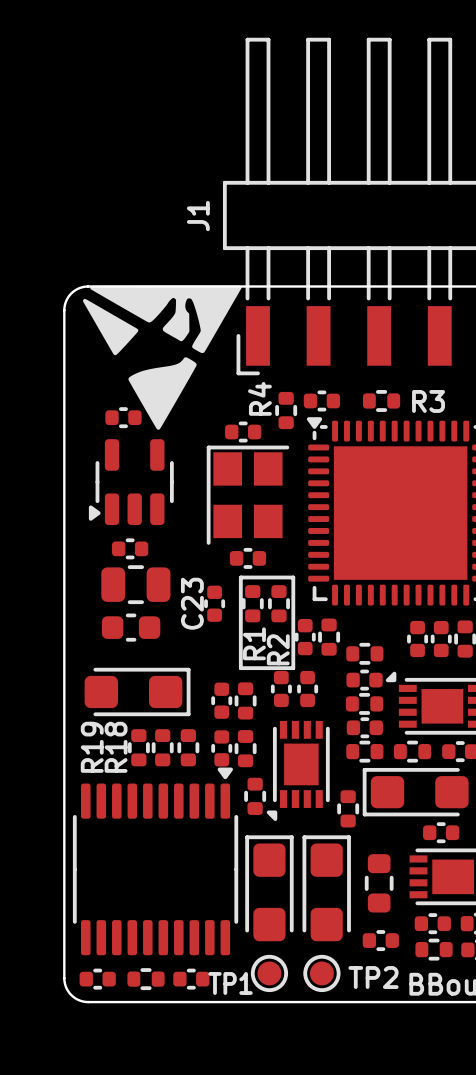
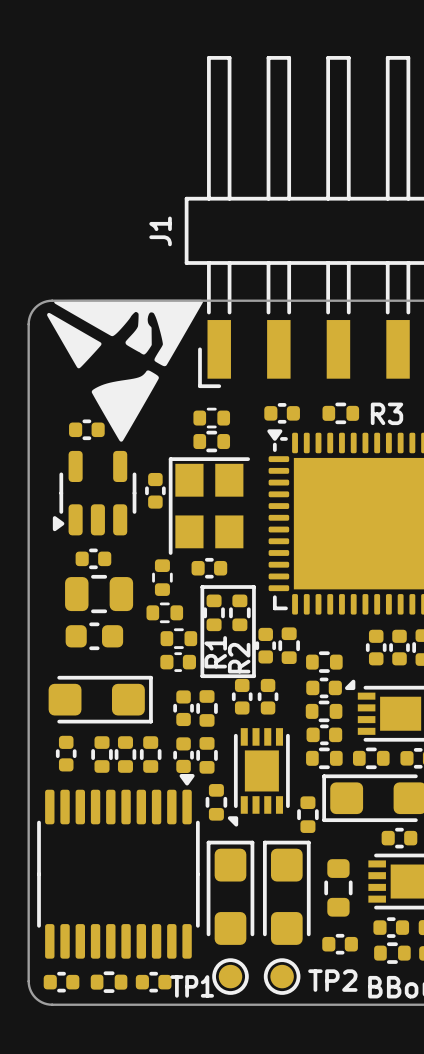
part: none -> (211, 418)
R4: (286, 410) -> none
part footprint: [225, 421, 262, 443] -> [193, 430, 231, 453]
part: none -> (155, 490)
part: none -> (162, 577)
part: none -> (164, 612)
C23: (214, 603) -> none
part: none -> (178, 638)
part: none -> (178, 662)
part: none -> (66, 753)
R19 name: R19 (92, 747) -> none
R18 name: R18 (116, 747) -> none

